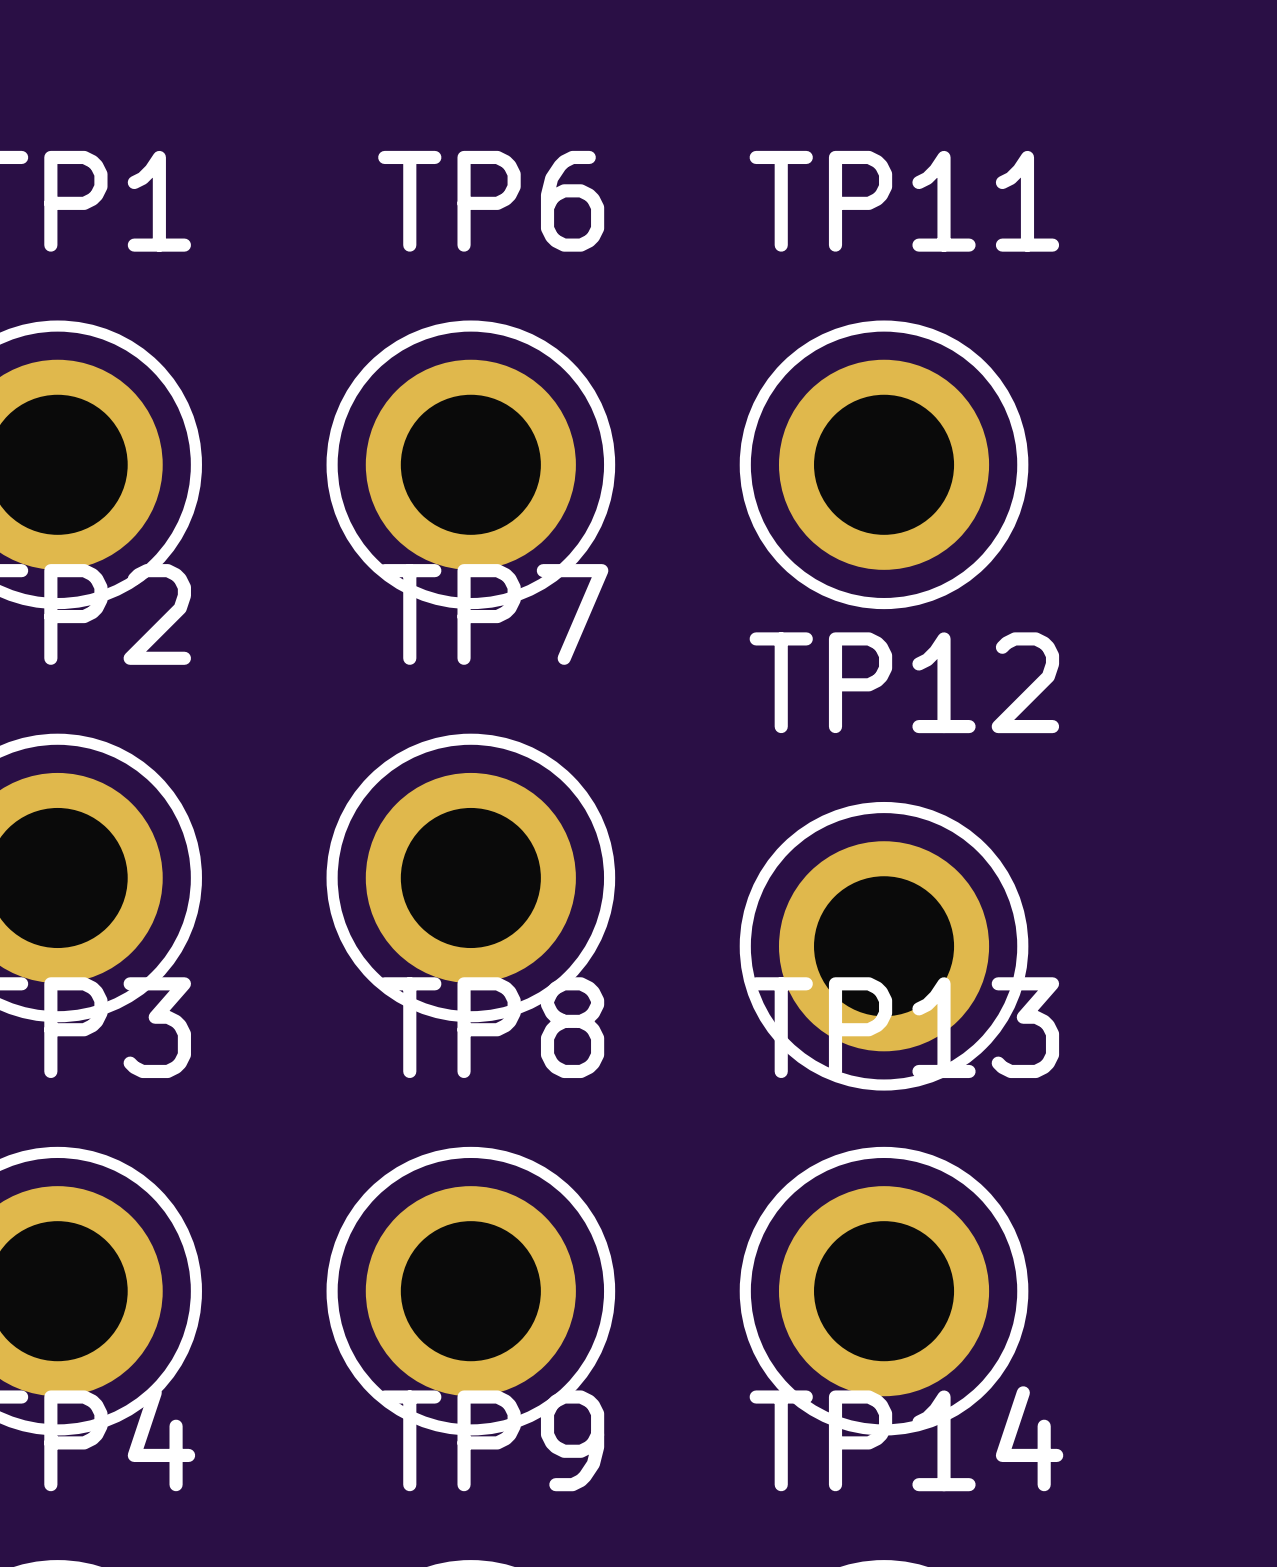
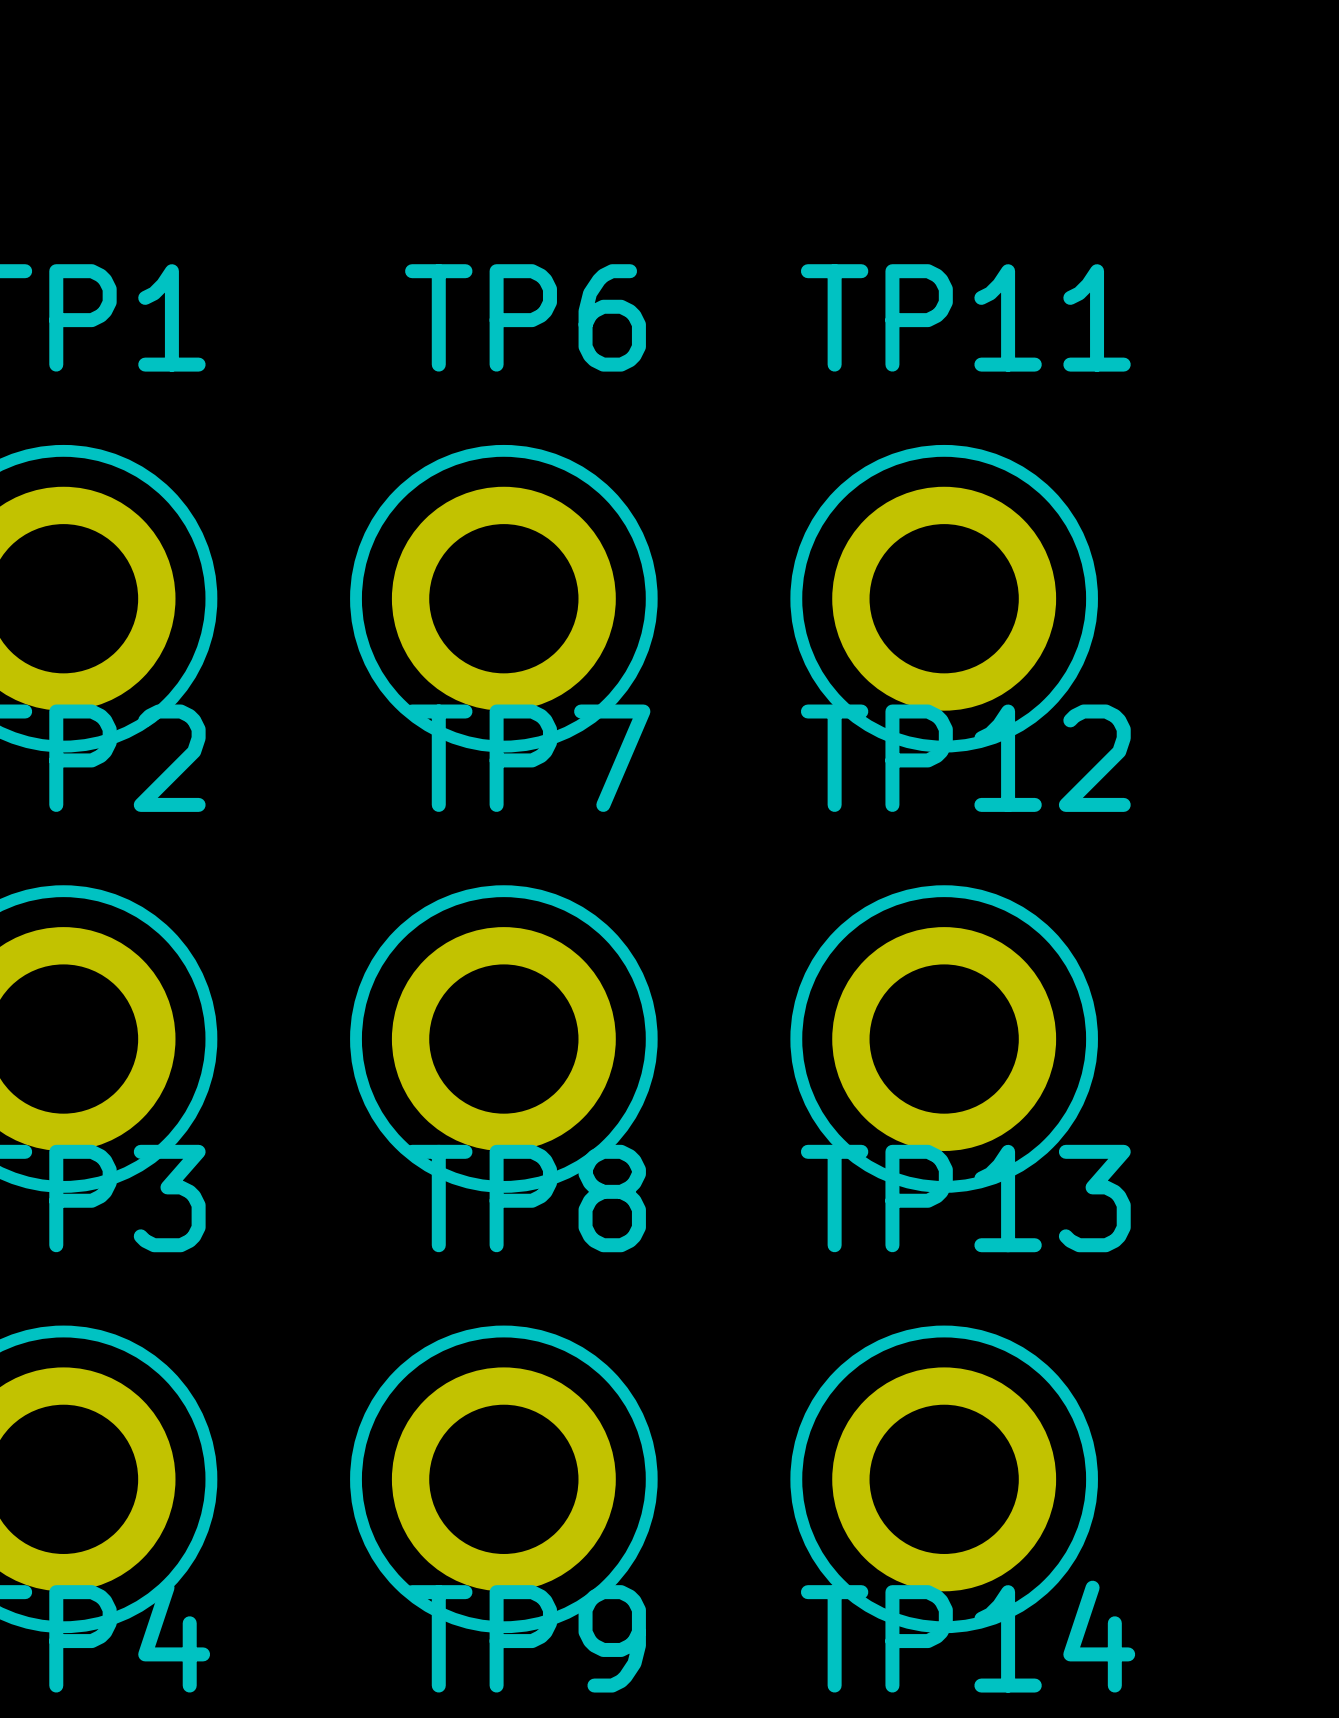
TP12 position: (884, 946) -> (944, 1039)

